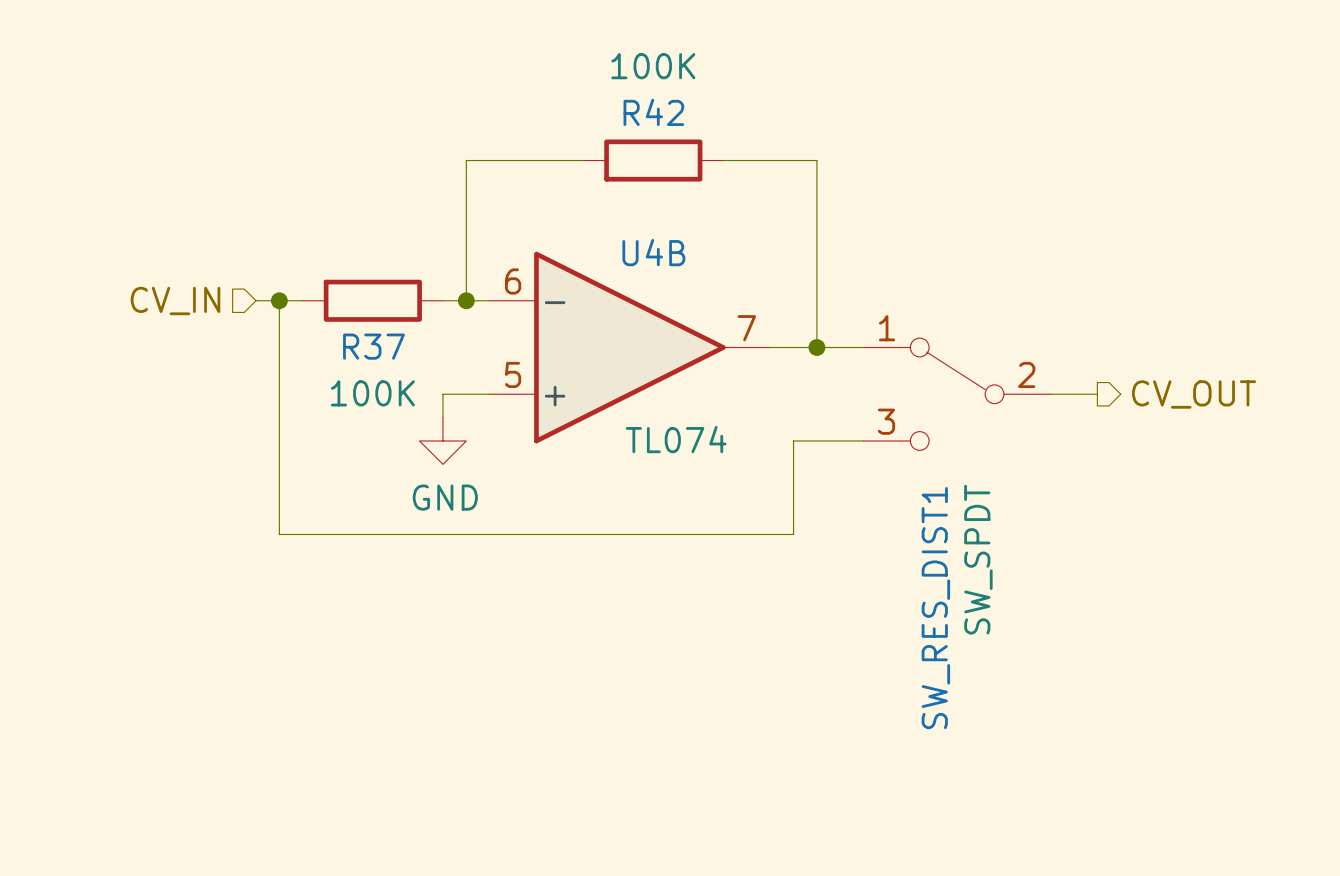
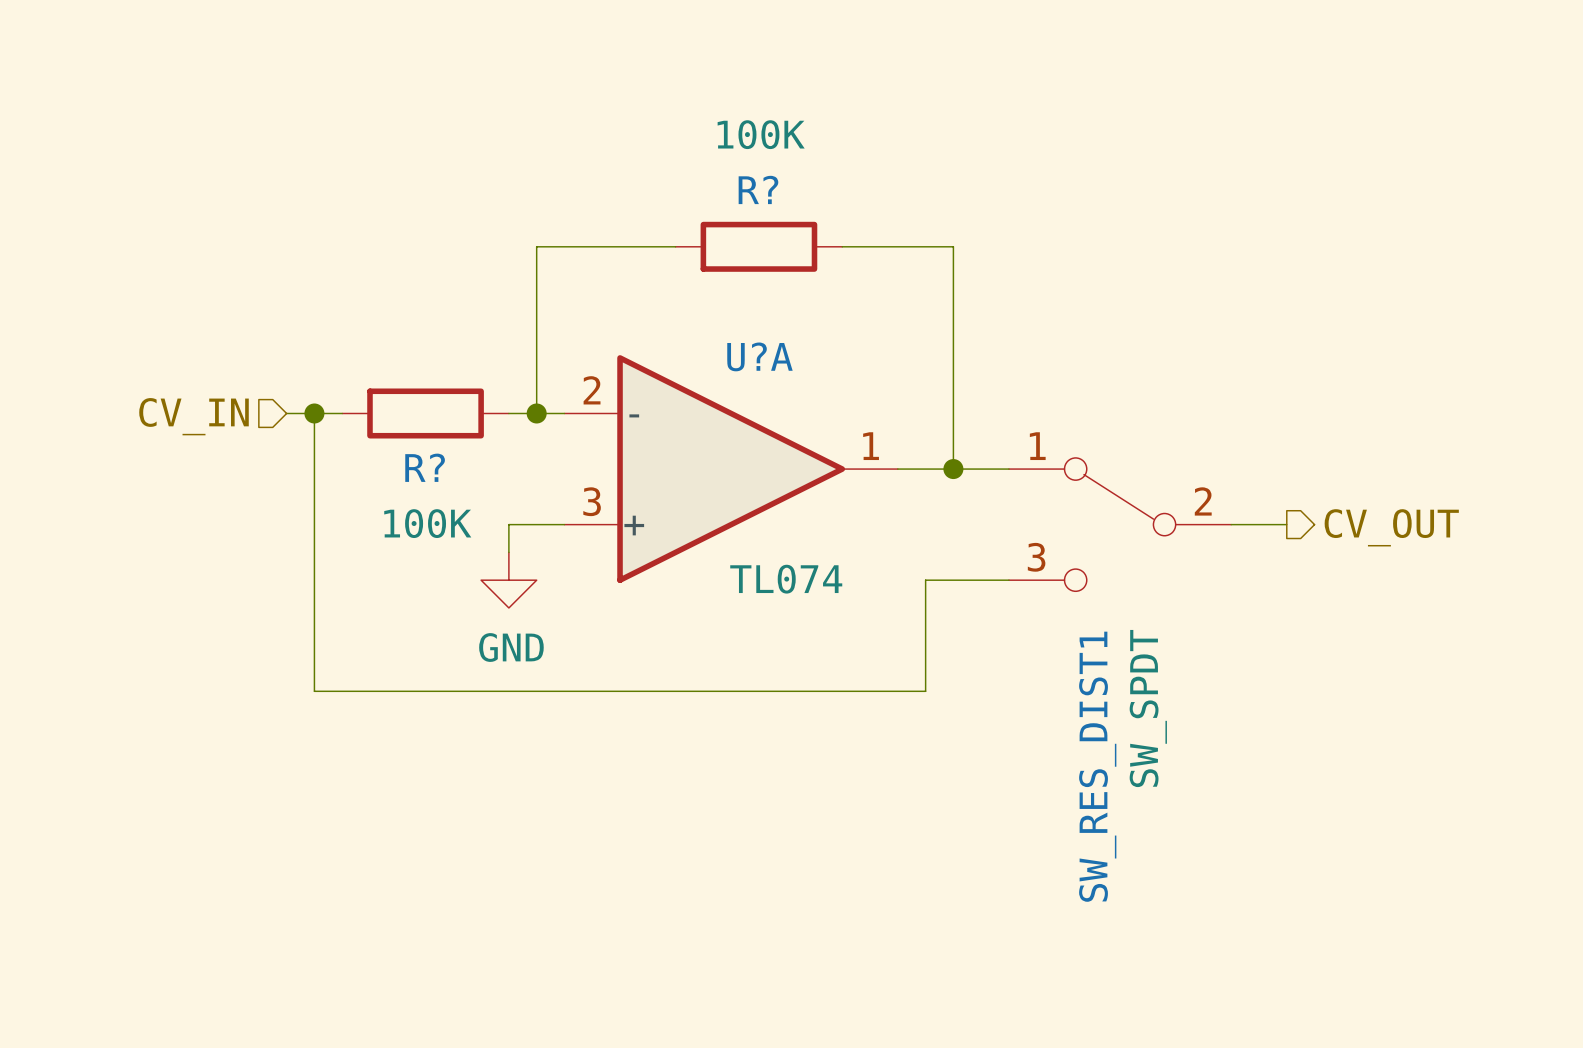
R42 name: R42 (653, 112) -> R? (758, 189)
U4B name: U4B (653, 252) -> U?A (759, 356)
U4B pin number: 6 (513, 281) -> 2 (592, 390)
U4B pin number: 7 (746, 328) -> 1 (871, 446)
R37 name: R37 (373, 346) -> R? (425, 467)
U4B pin number: 5 (513, 374) -> 3 (592, 501)

